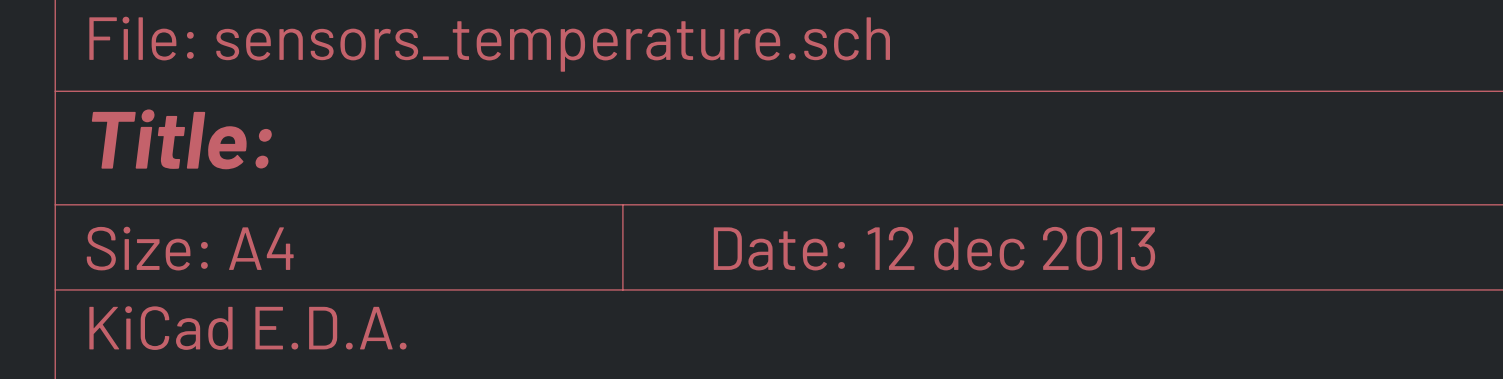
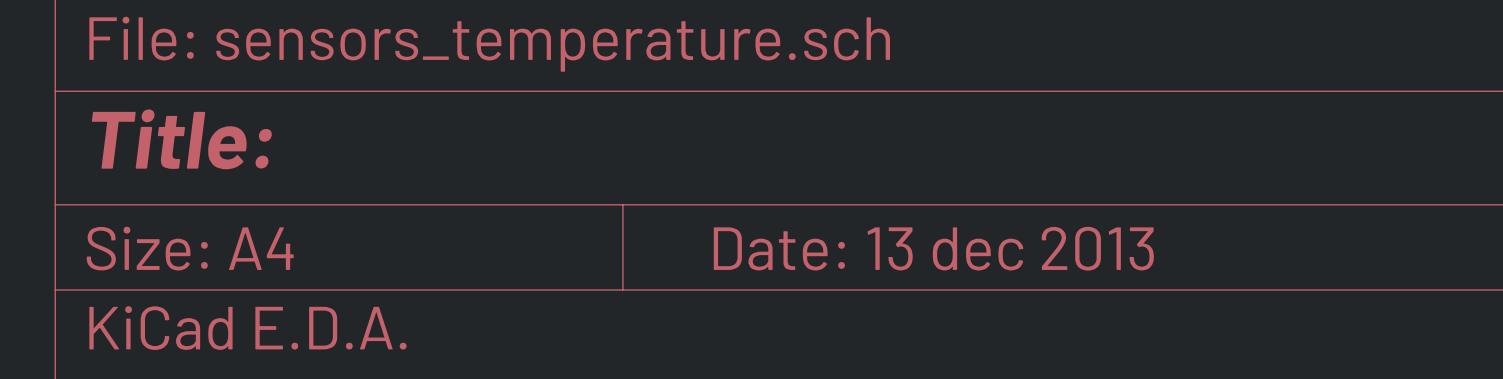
title block: Date: 12 dec 2013 (934, 248) -> Date: 13 dec 2013 (933, 248)

